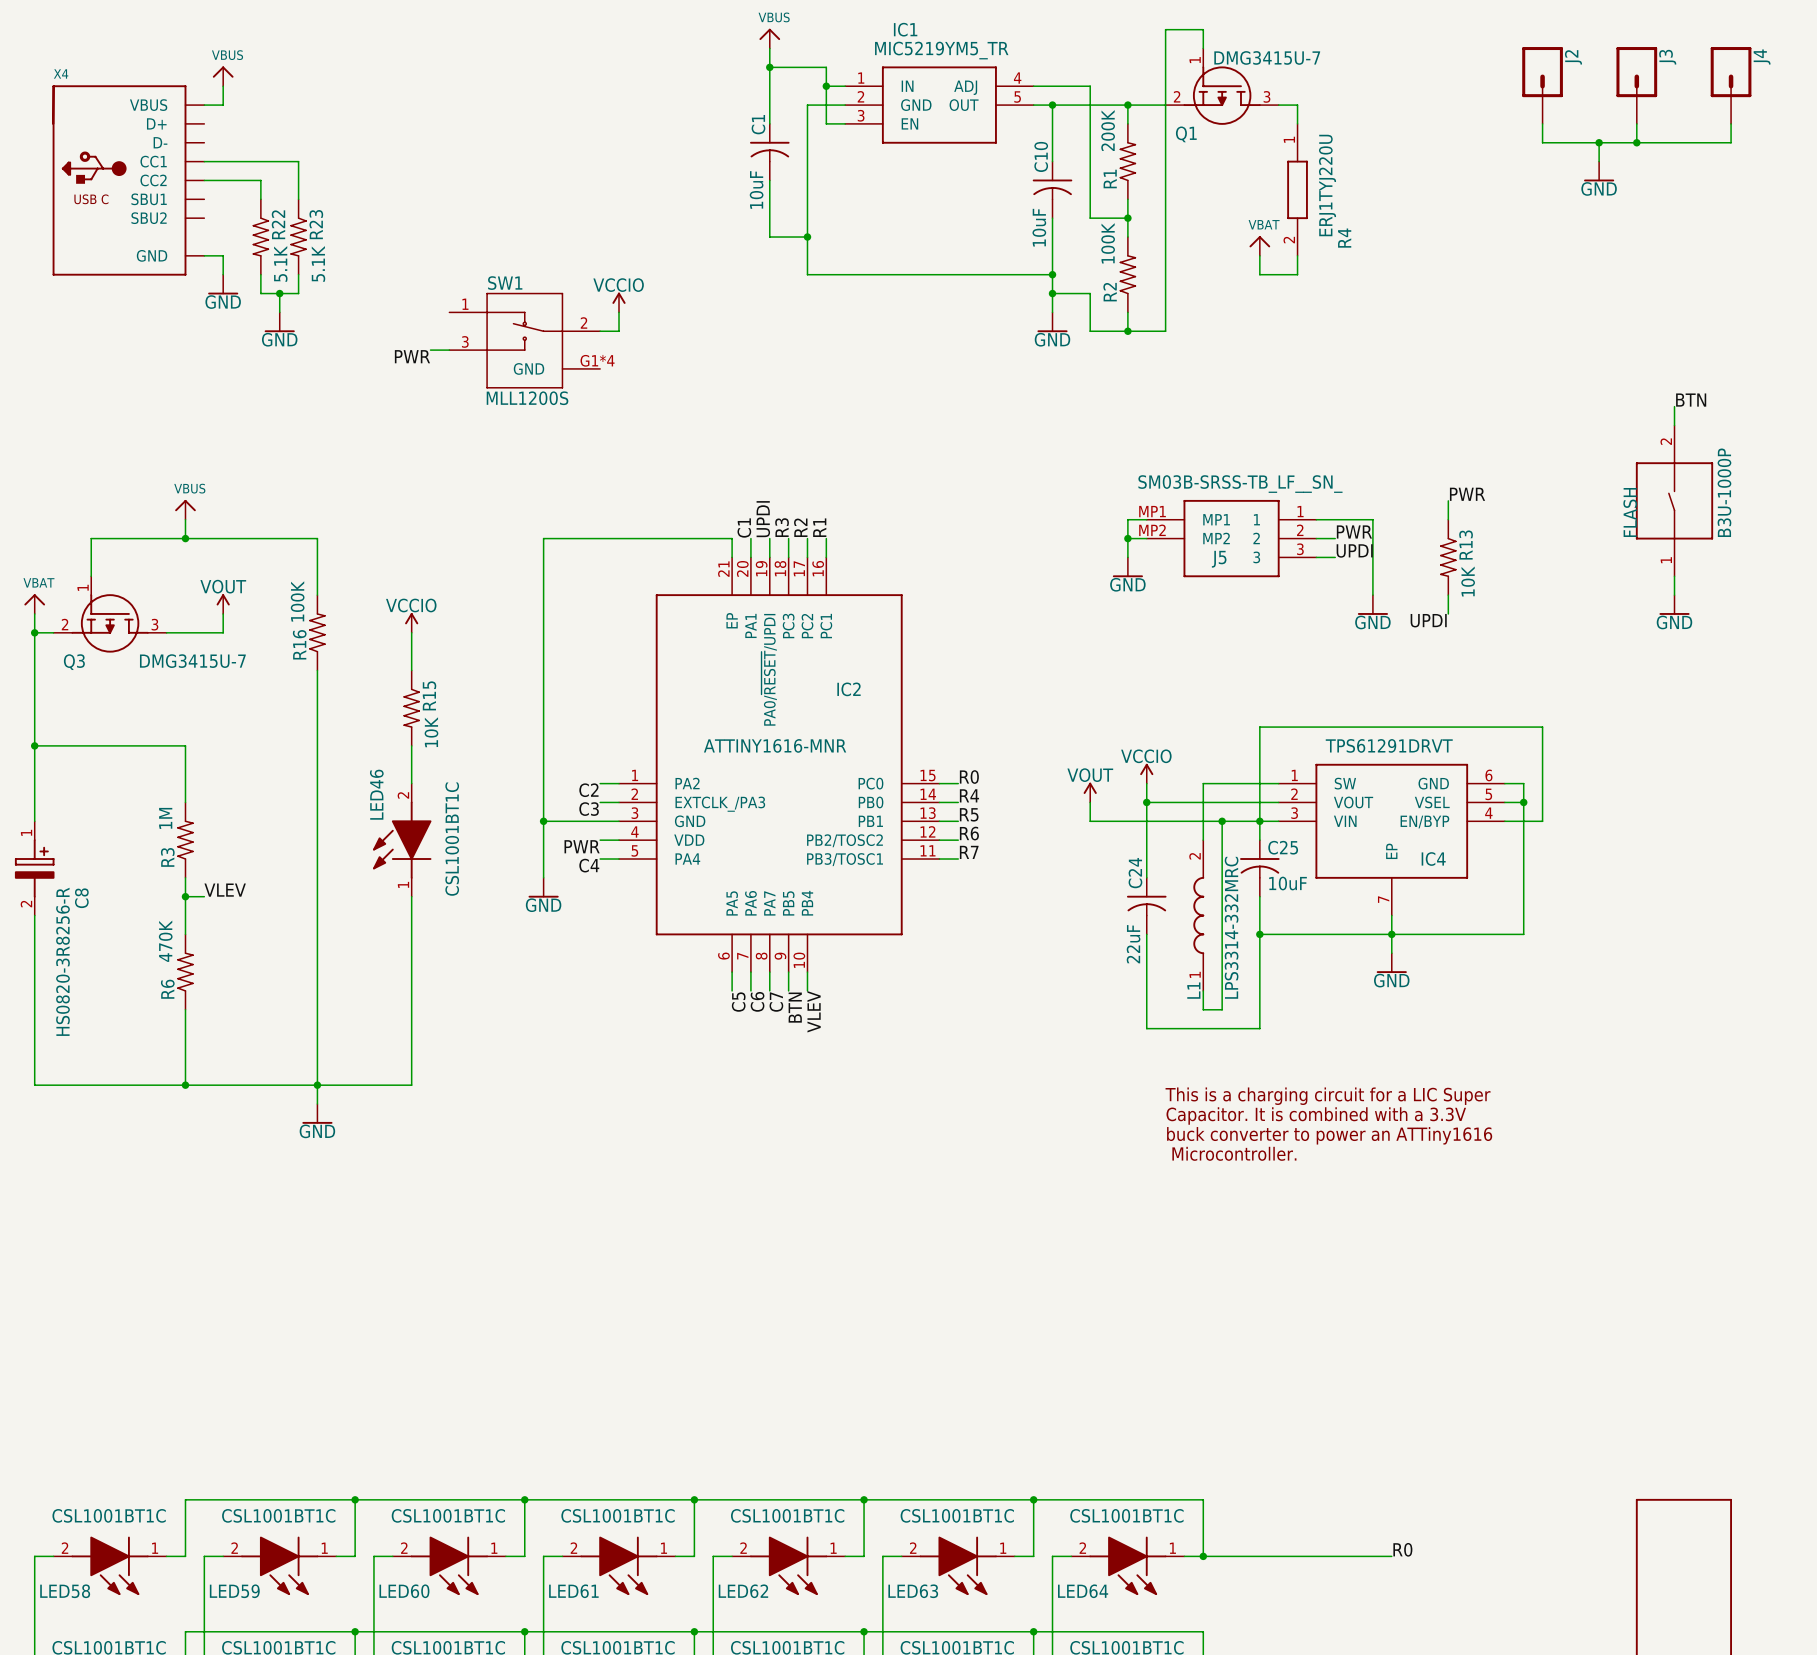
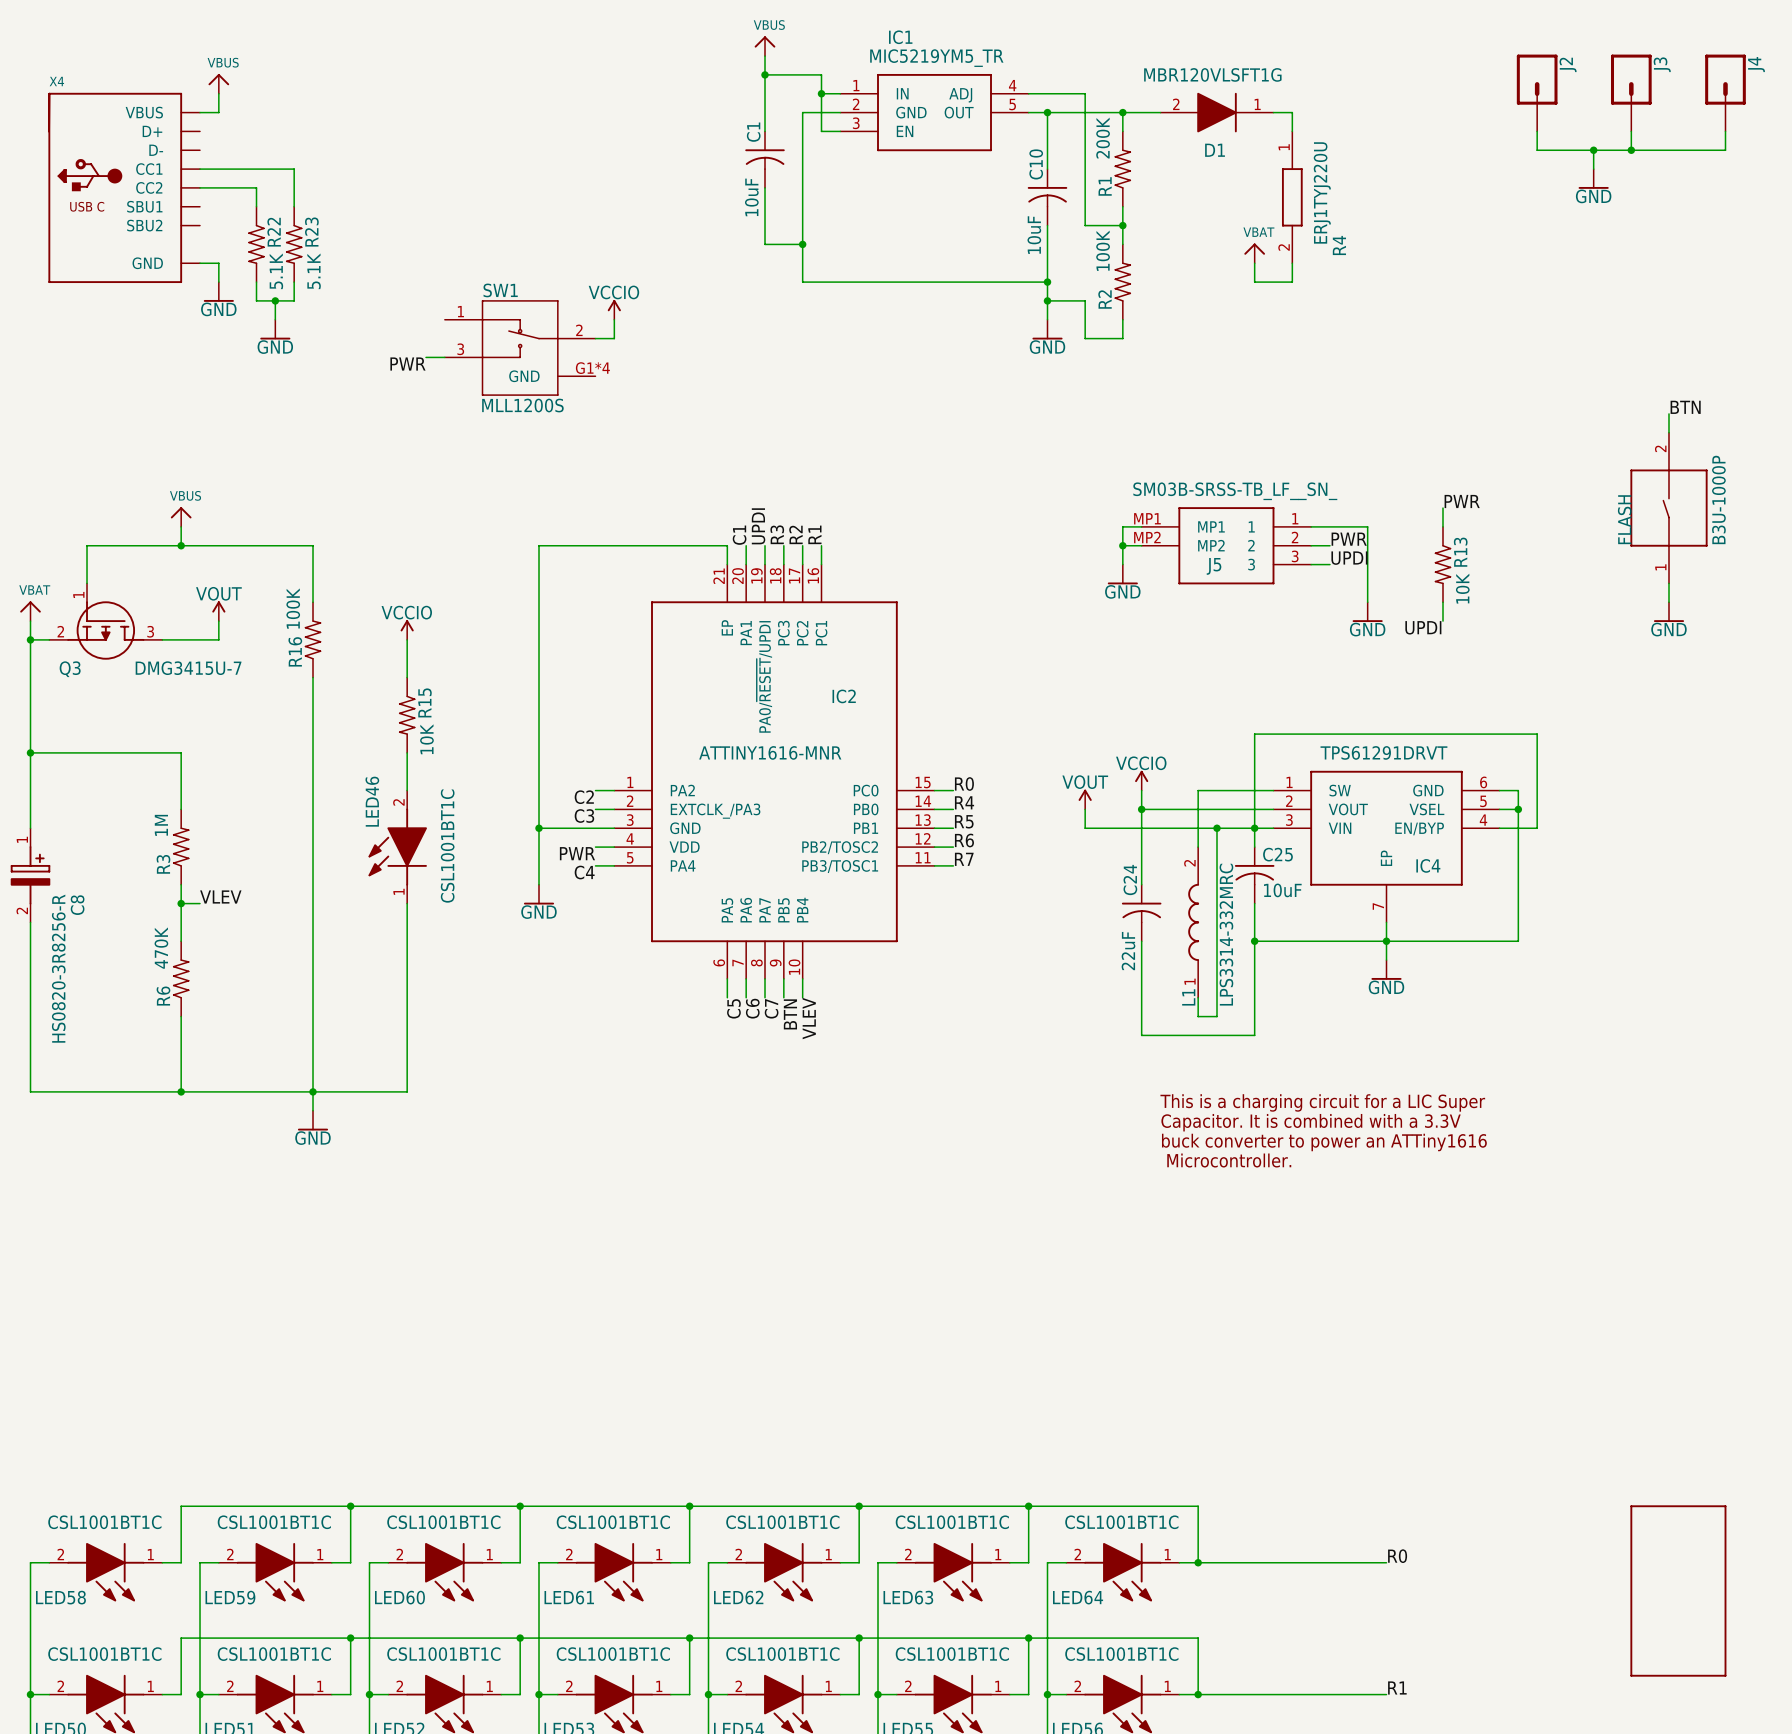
wire: (1203, 48) (1203, 29) (1165, 29) (1165, 331) (1127, 331) -> none
Q1: DMG3415U-7 (1222, 86) -> none
D1: none -> MBR120VLSFT1G (1217, 112)
junction: (1127, 331) -> none

